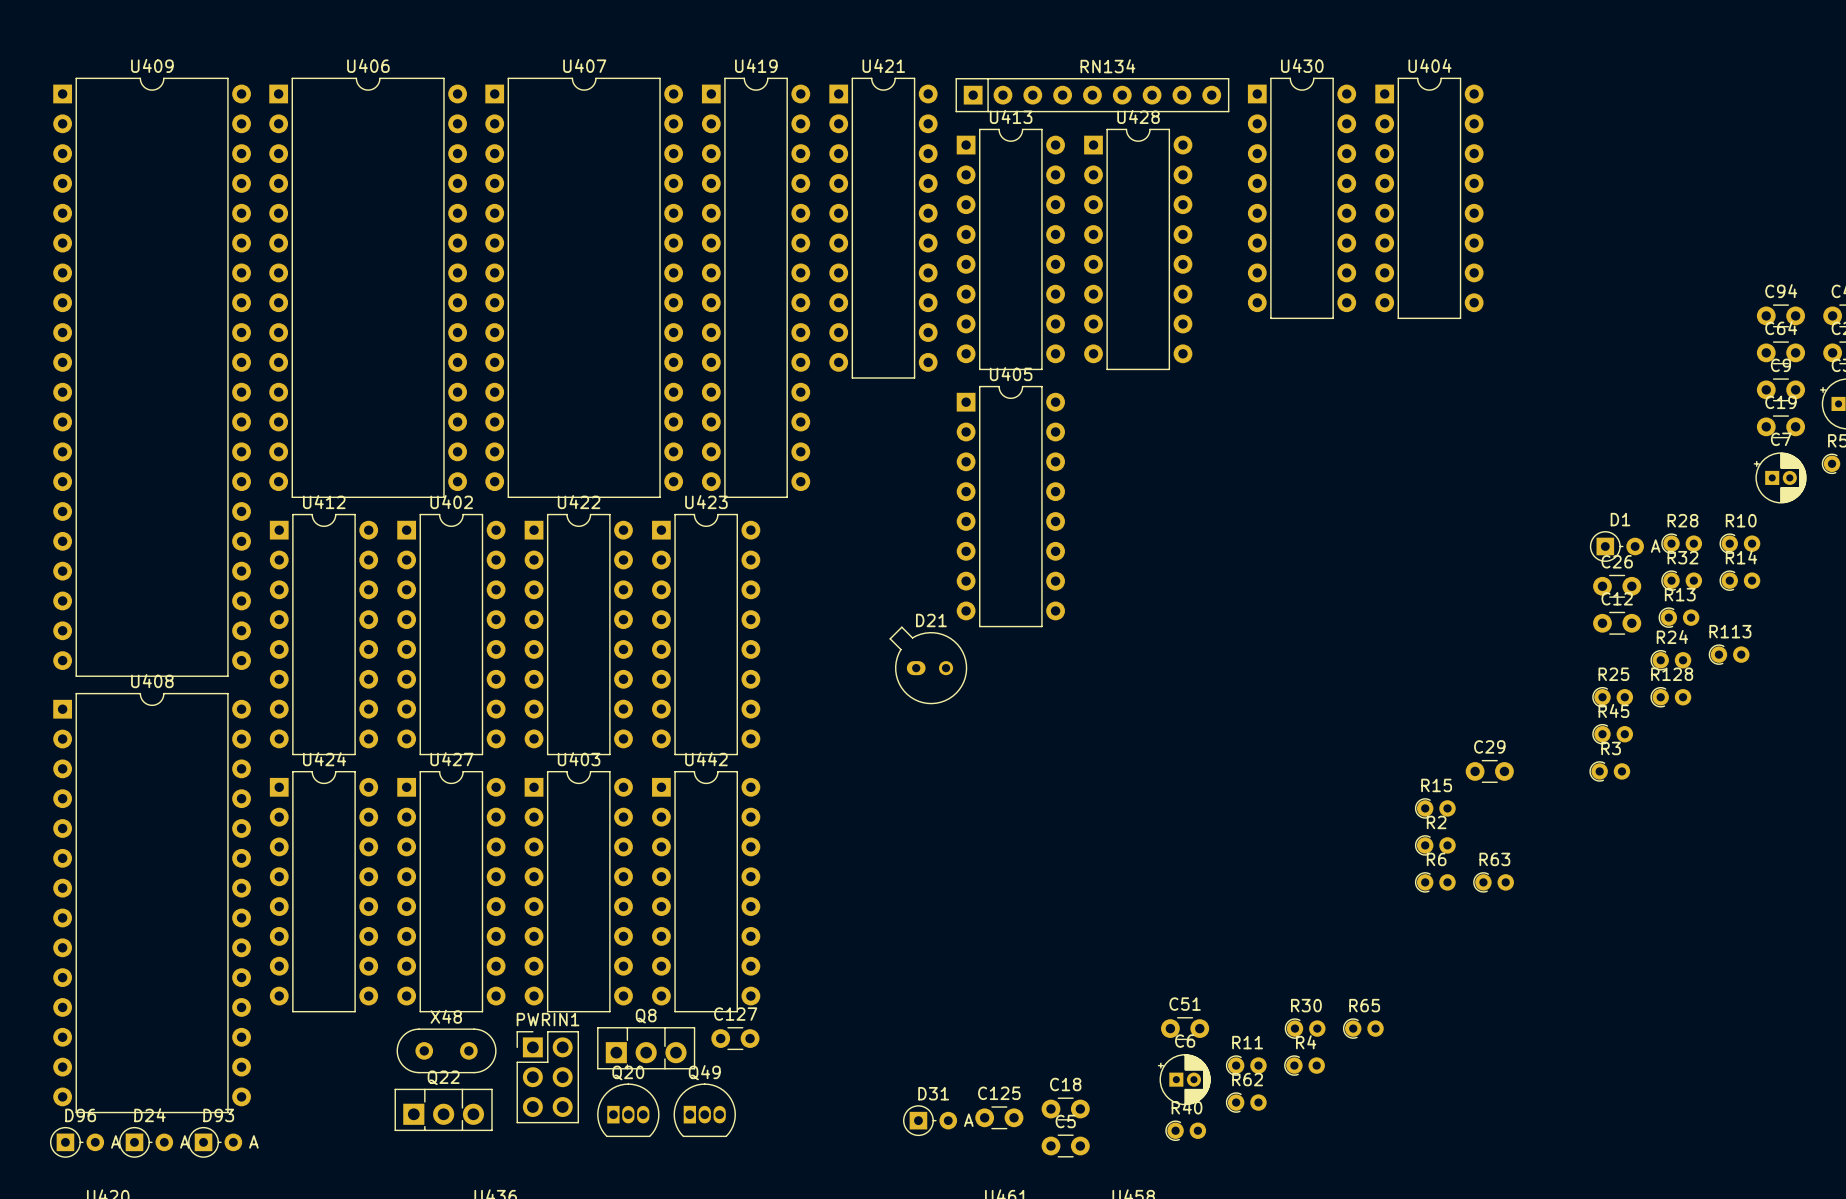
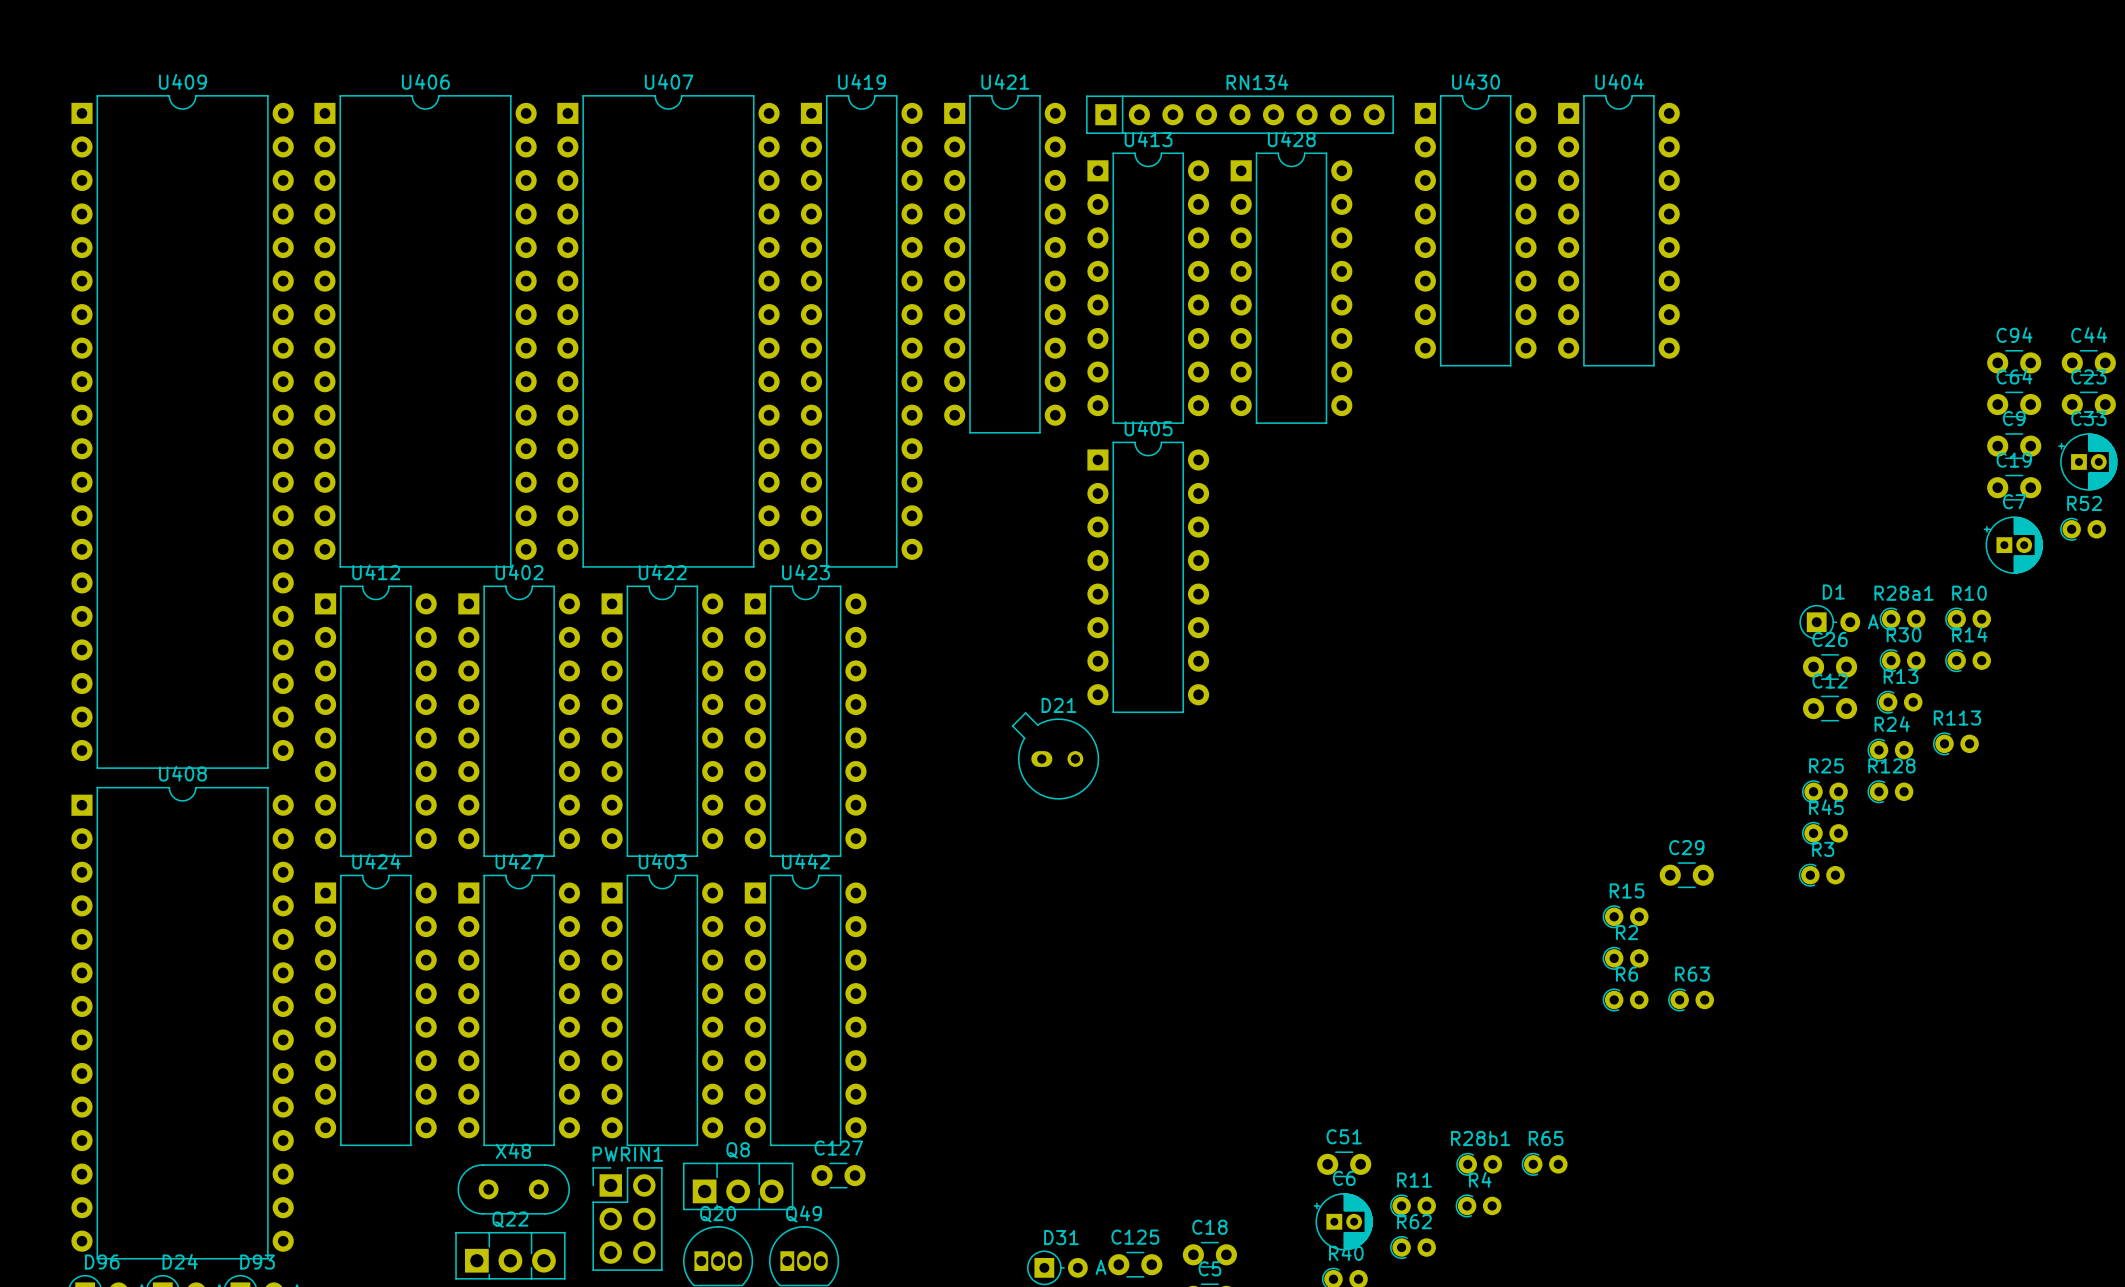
R28 name: R28 (1682, 520) -> R28a1 (1904, 593)
R32 name: R32 (1682, 557) -> R30 (1904, 634)
R30 name: R30 (1306, 1005) -> R28b1 (1480, 1138)

